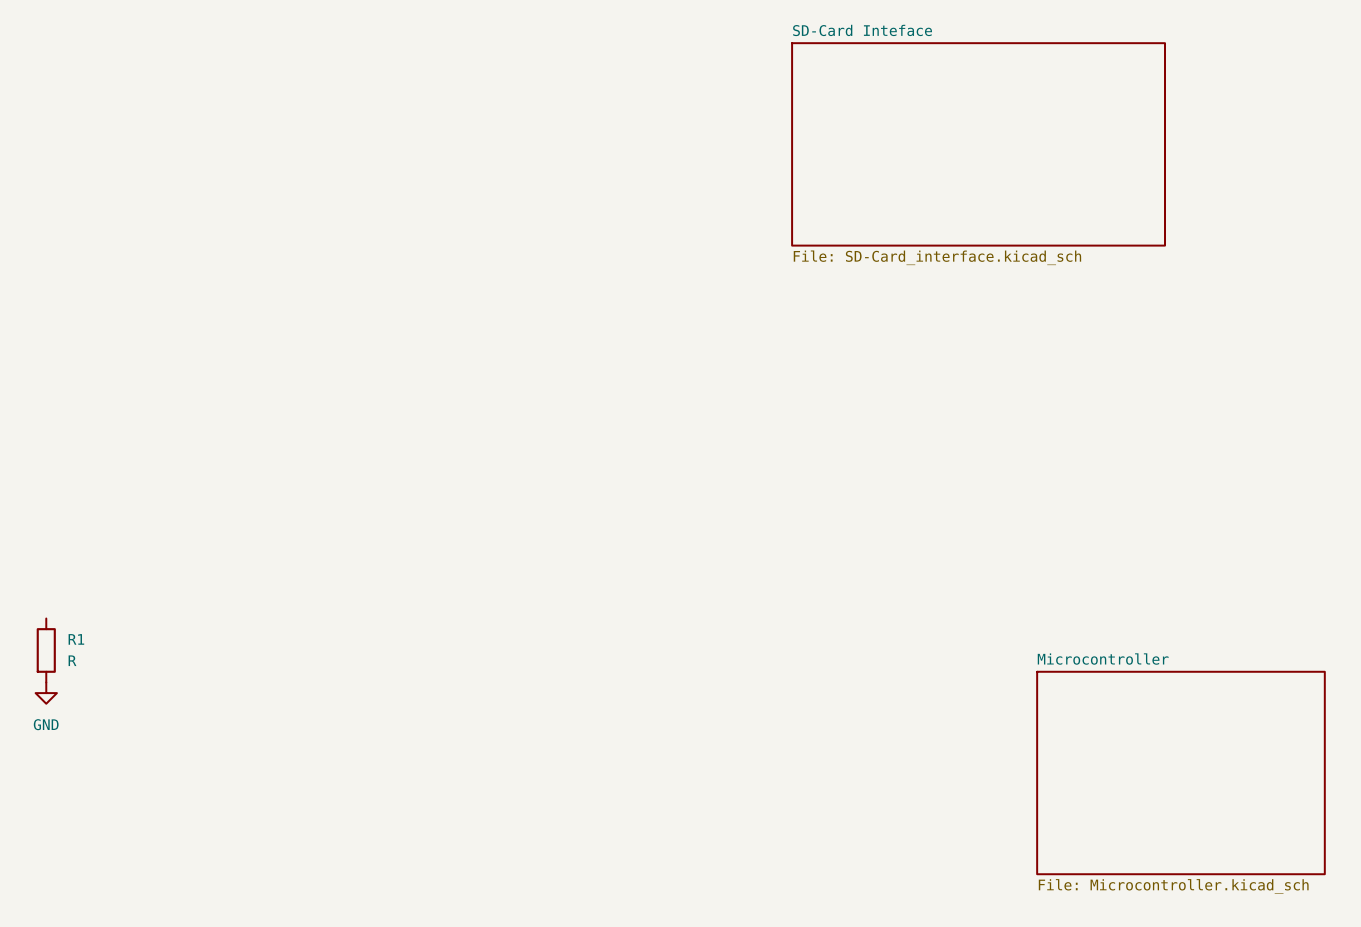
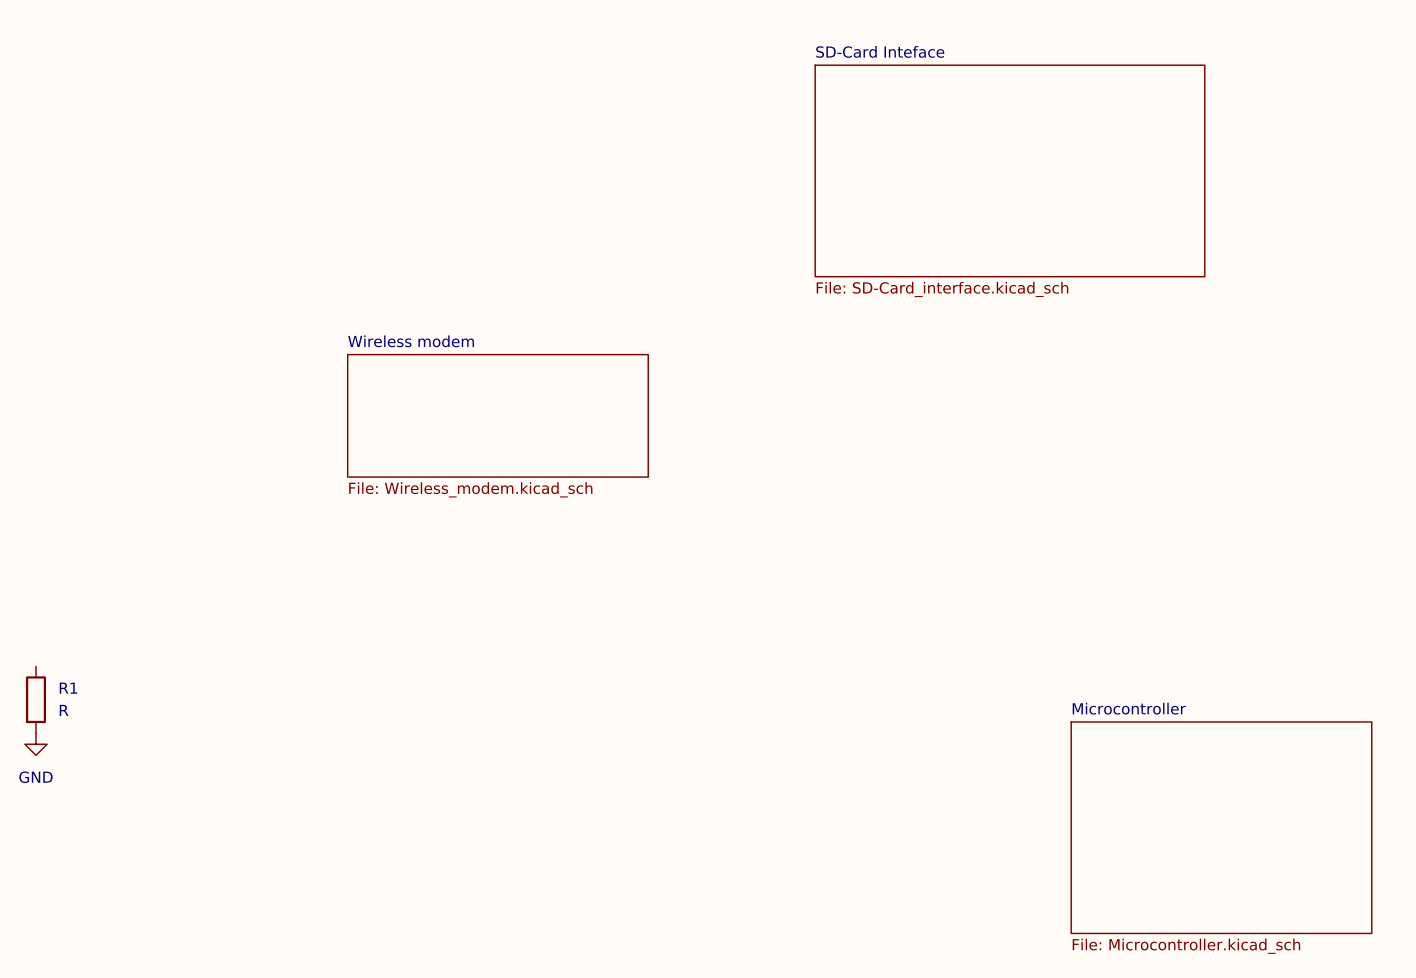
sheet Wireless modem: none -> File: Wireless_modem.kicad_sch (497, 415)

